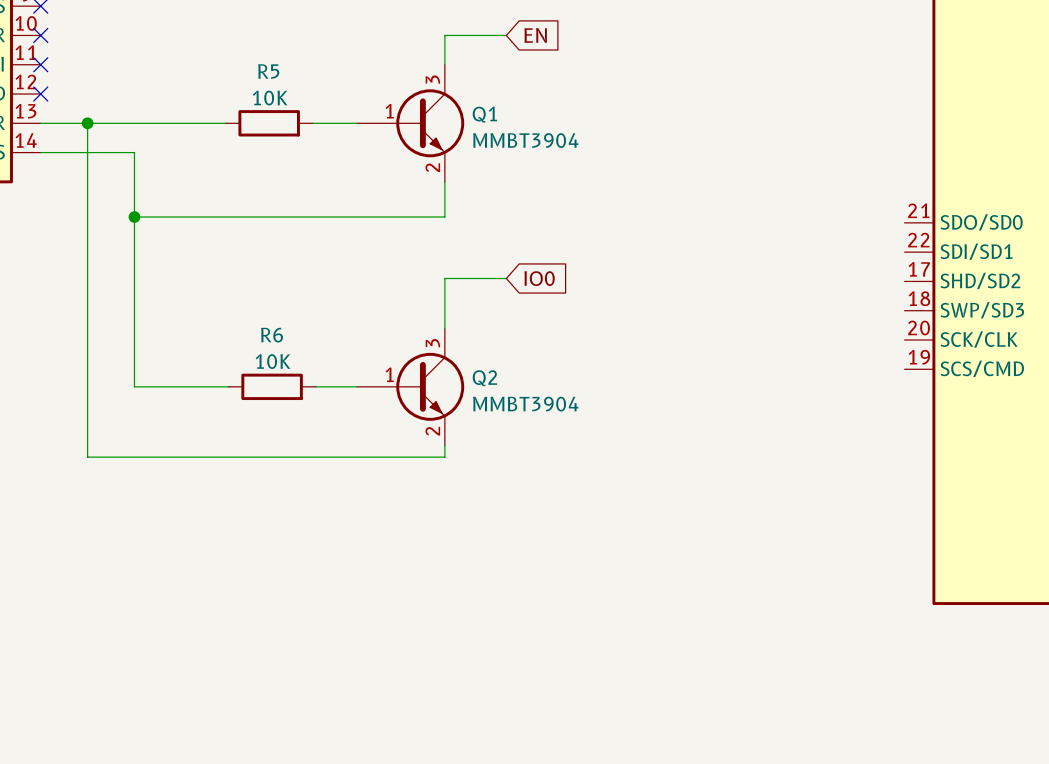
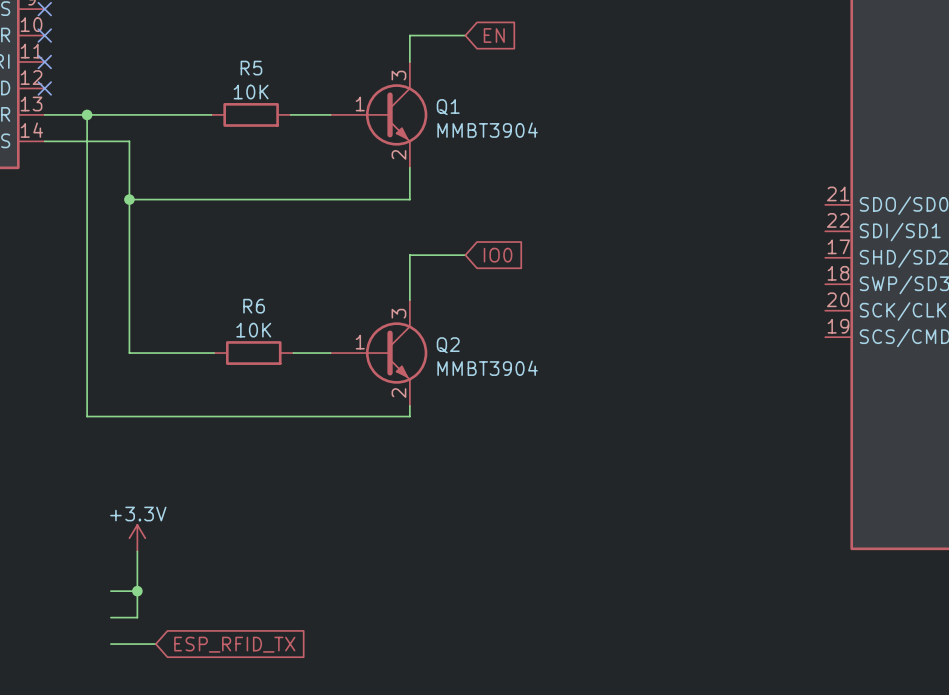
power symbol: none -> +3.3V (137, 538)
wire: none -> (137, 551) (137, 617) (110, 617)
wire: none -> (110, 591) (137, 591)
junction: none -> (137, 591)
wire: none -> (110, 644) (155, 644)
global label: none -> ESP_RFID_TX (234, 644)

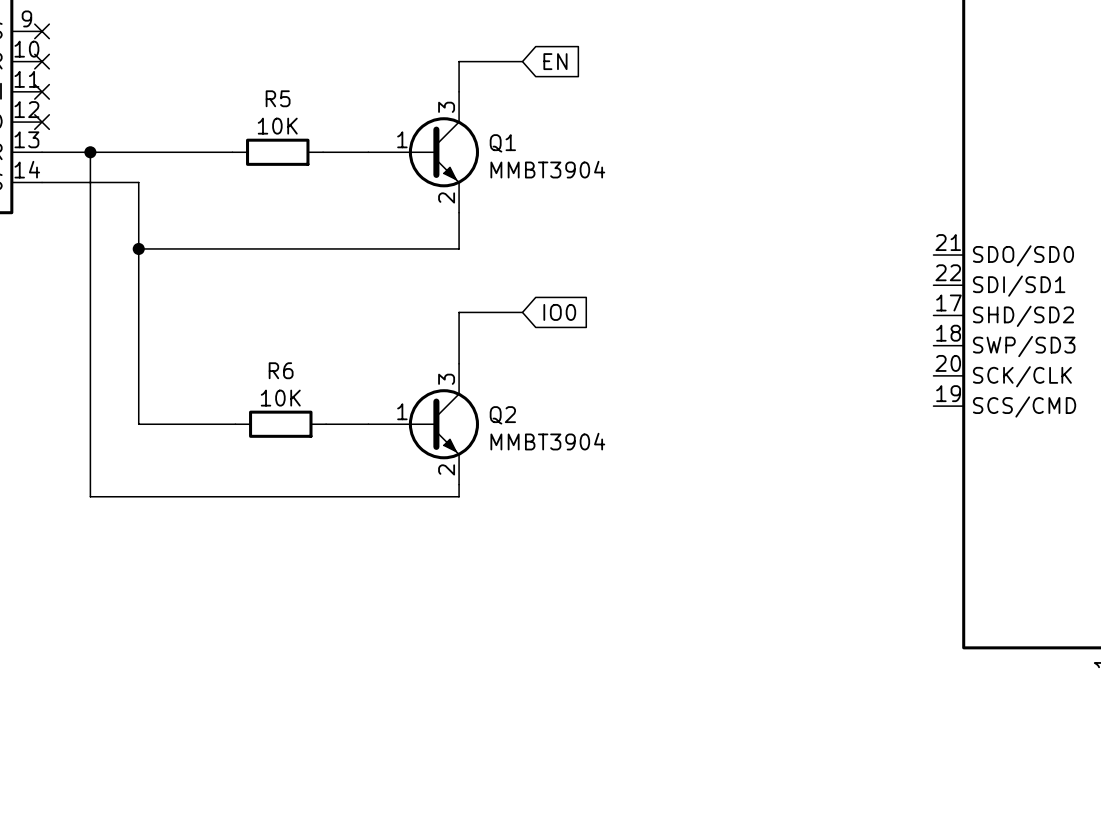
power symbol: +3.3V (137, 538) -> none
wire: (137, 551) (137, 617) (110, 617) -> none
wire: (110, 591) (137, 591) -> none
junction: (137, 591) -> none
wire: (110, 644) (155, 644) -> none
global label: ESP_RFID_TX (234, 644) -> none

